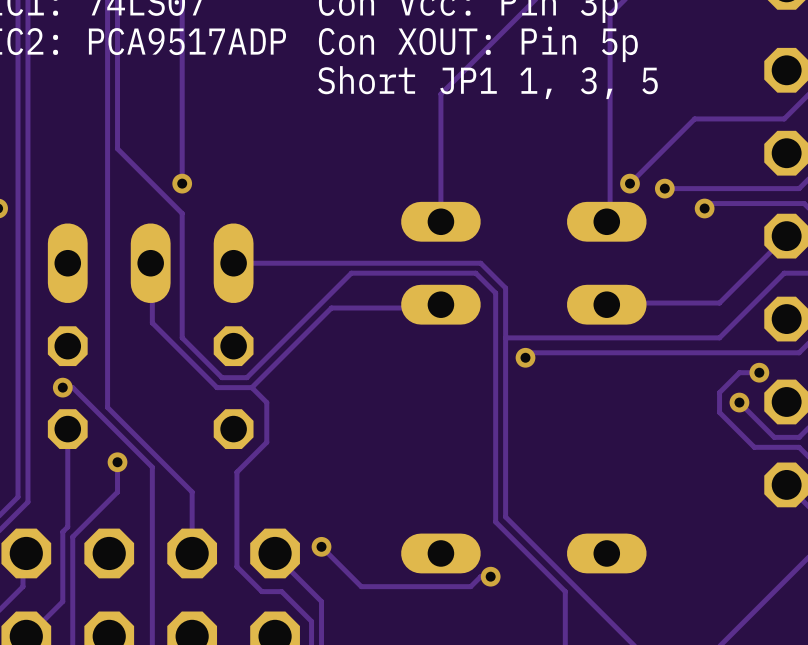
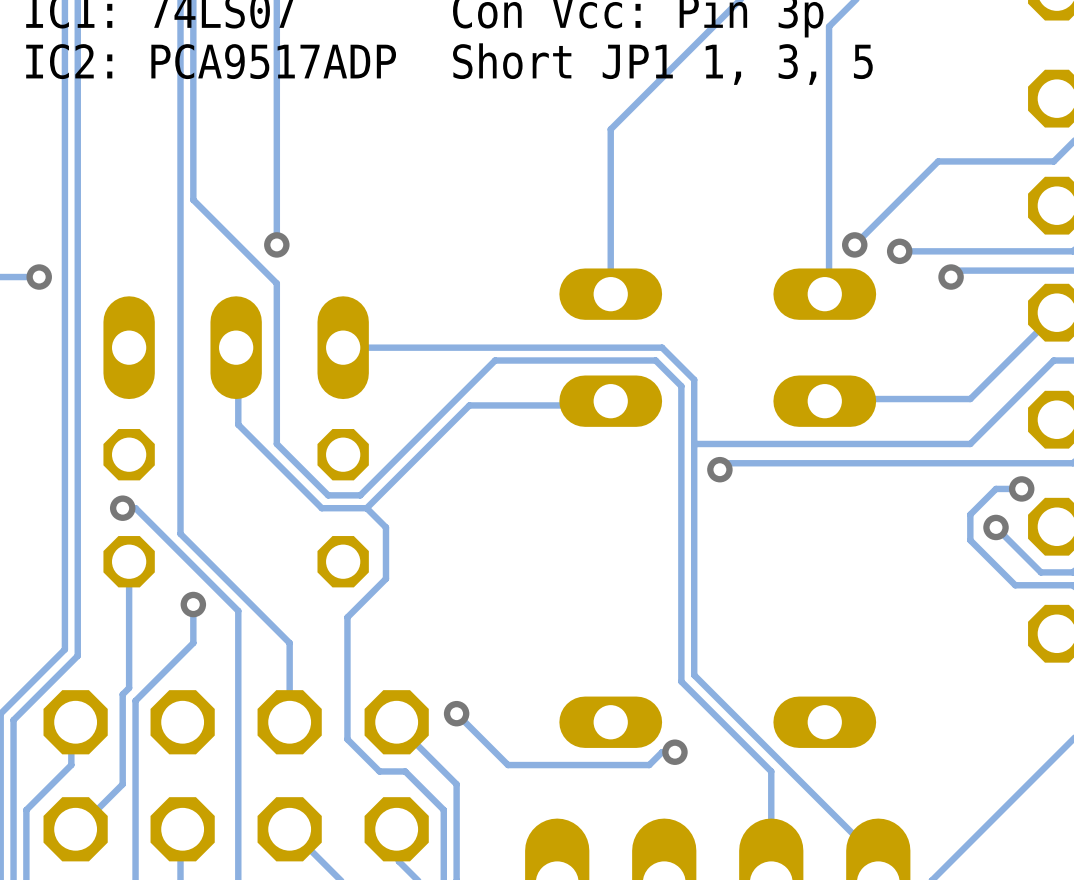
text: Con XOUT: Pin 5p (478, 44) -> Short JP1 1, 3, 5 (662, 64)
text: Short JP1 1, 3, 5 (487, 82) -> none

